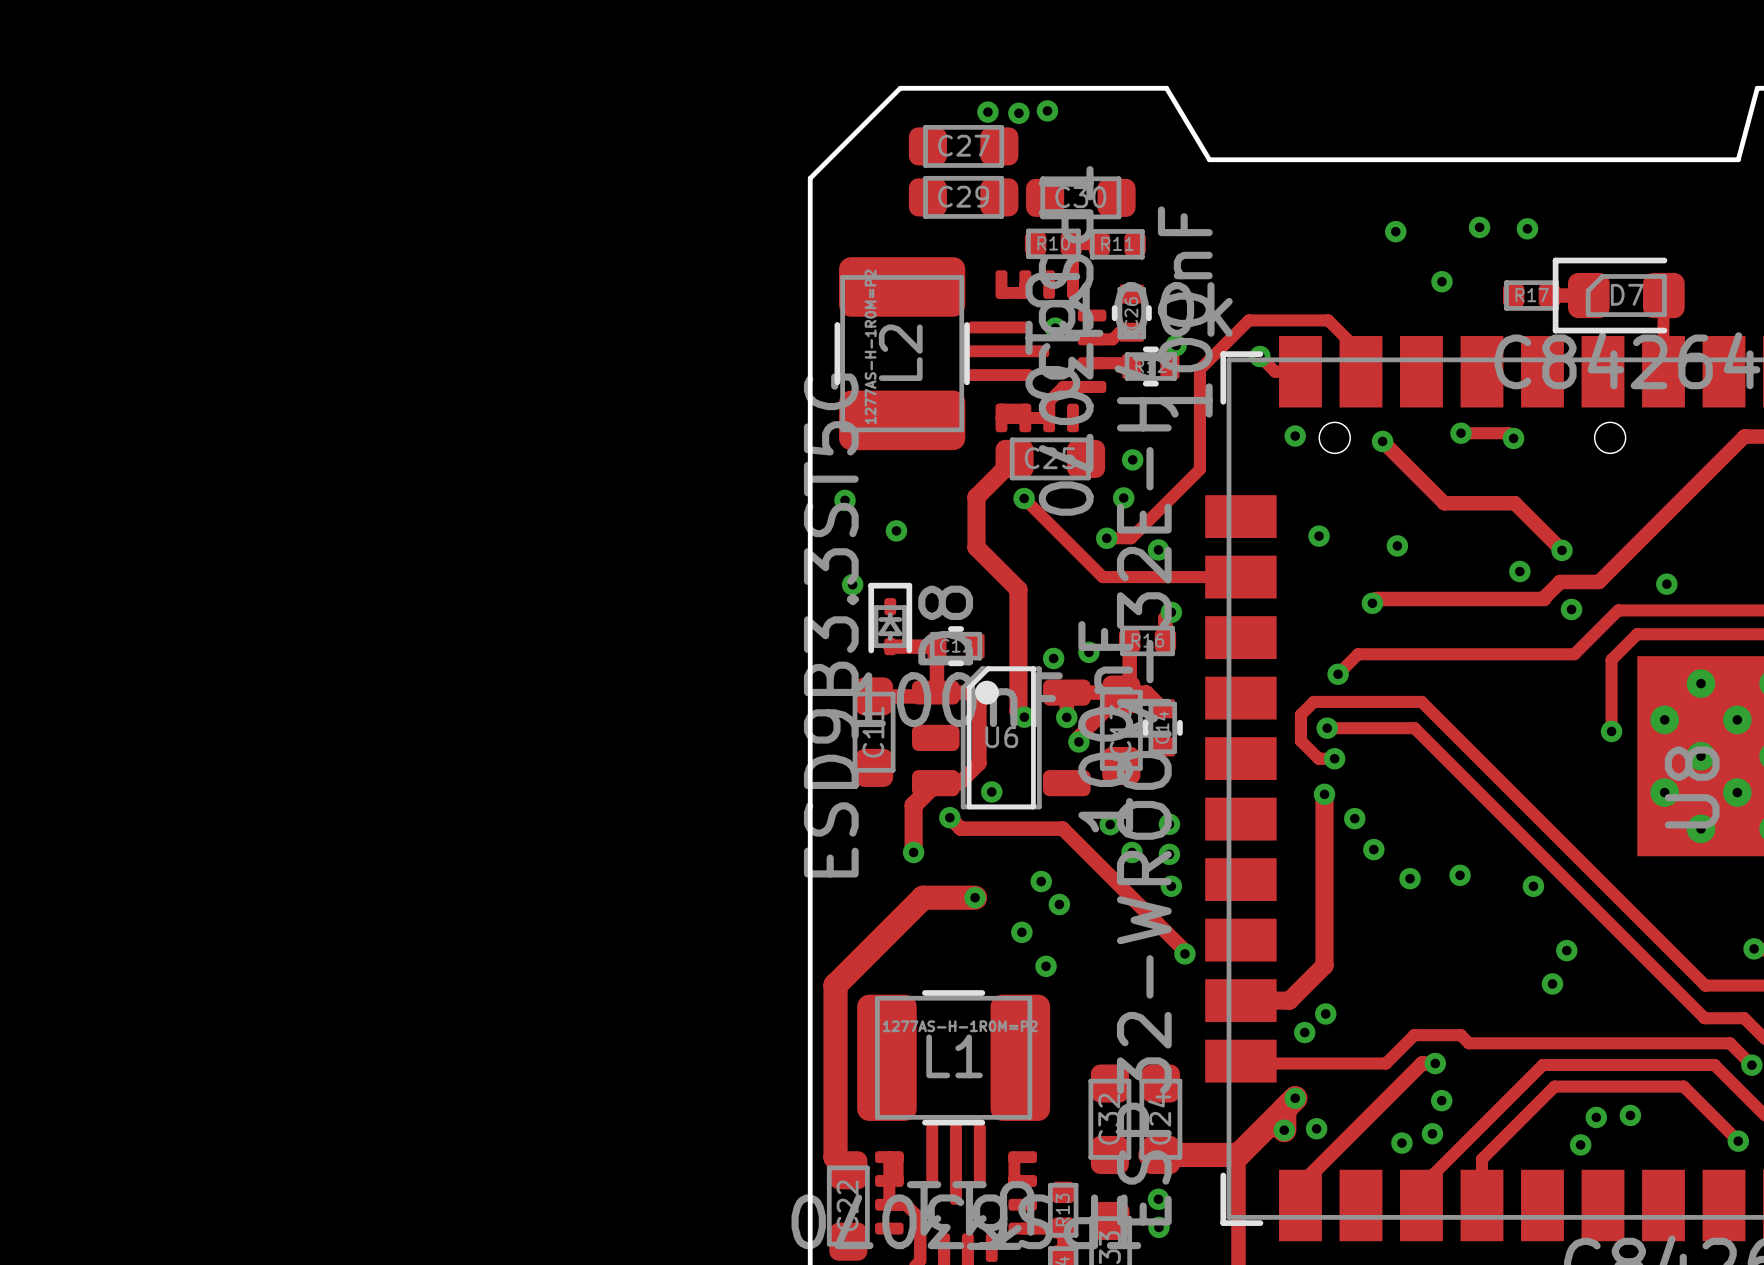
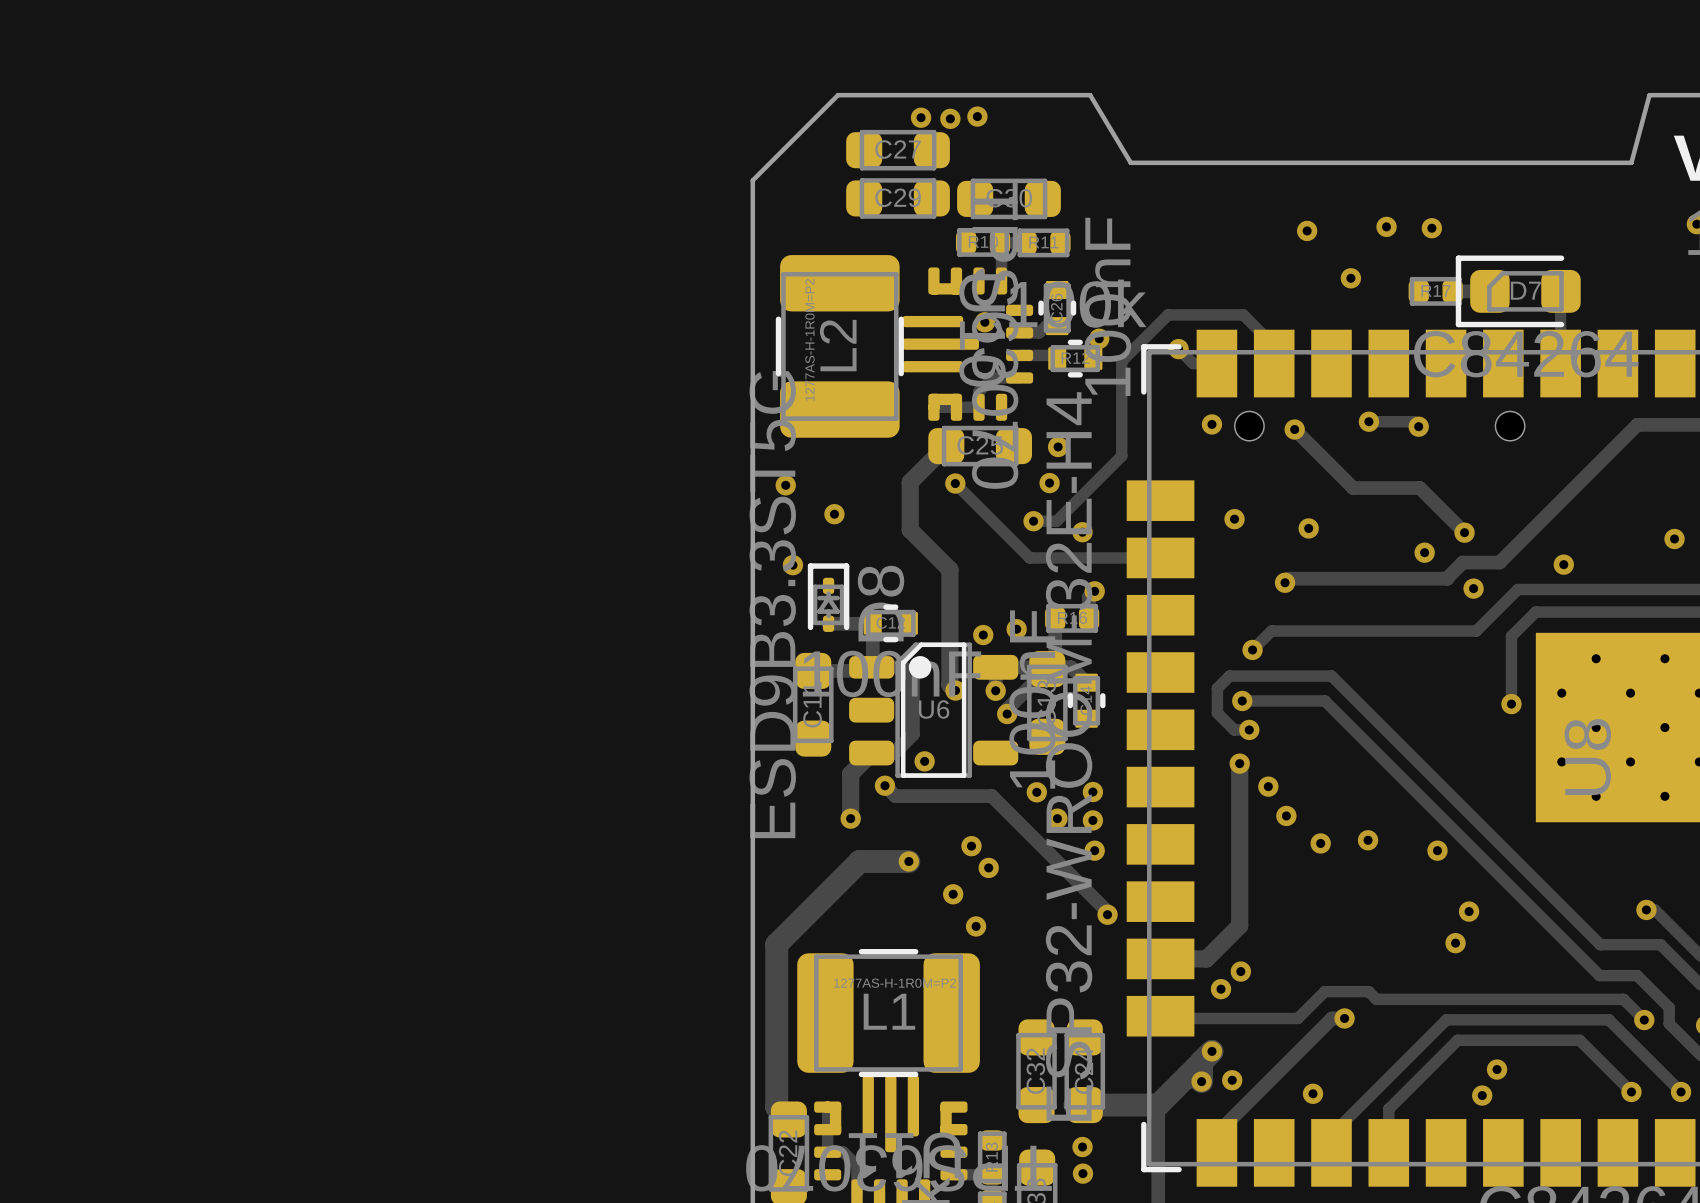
via: (1441, 1100) -> none
via: (1630, 1115) -> none
via: (1432, 1133) -> none

